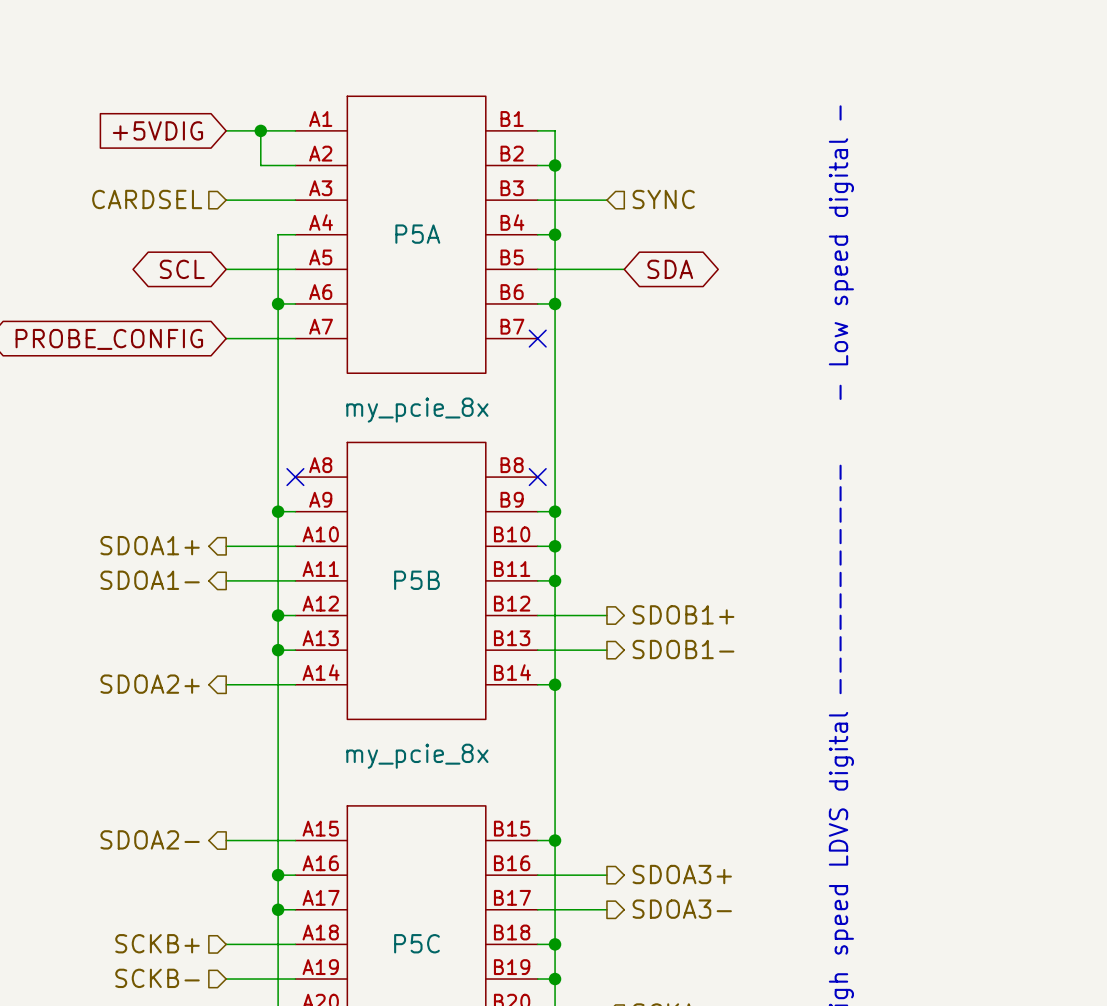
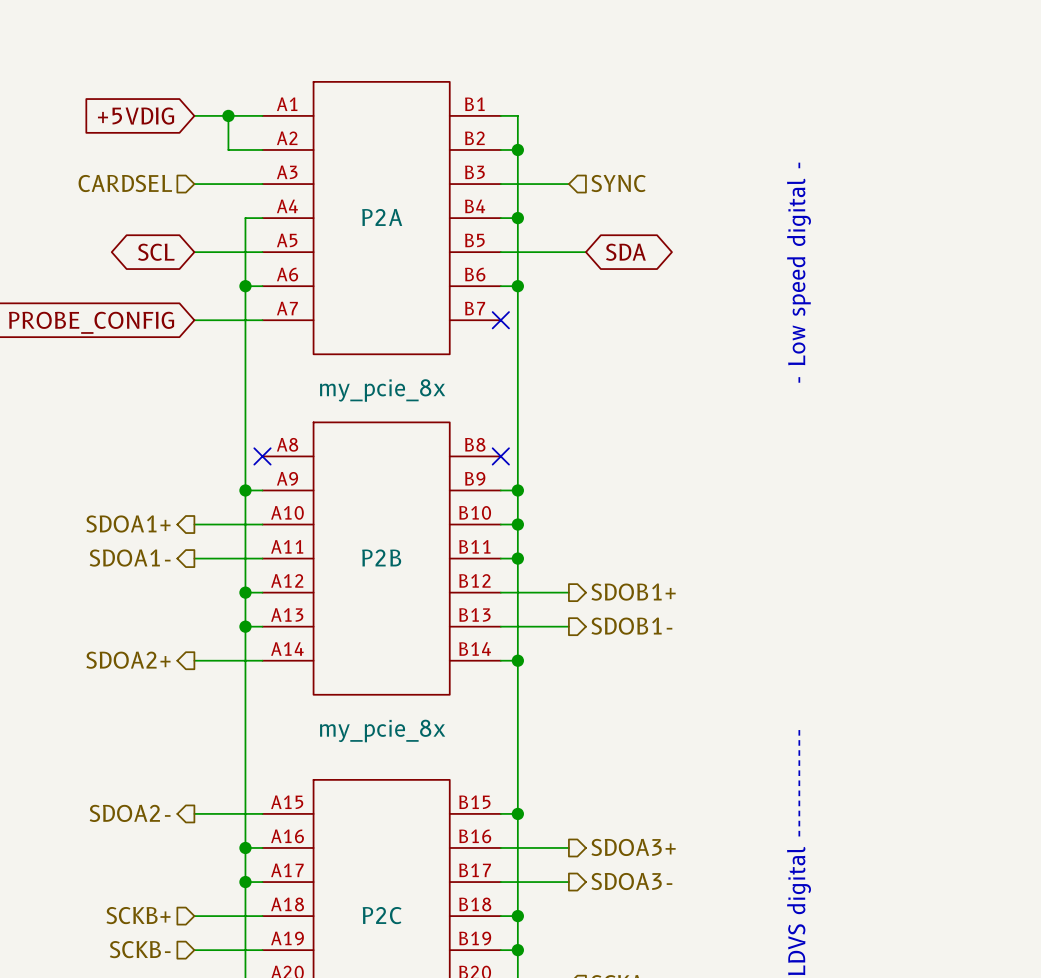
P5A name: P5A (417, 234) -> P2A (382, 217)
P5B name: P5B (416, 580) -> P2B (381, 557)
P5C name: P5C (416, 943) -> P2C (382, 915)

